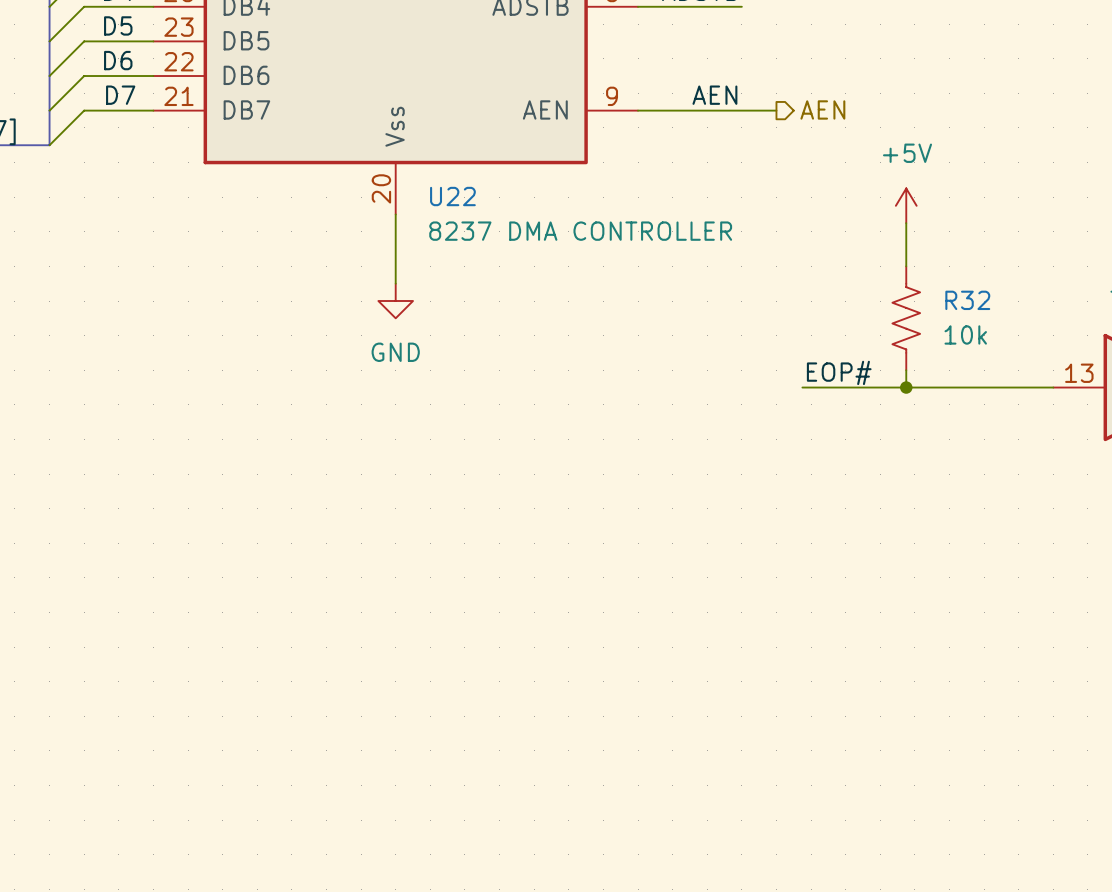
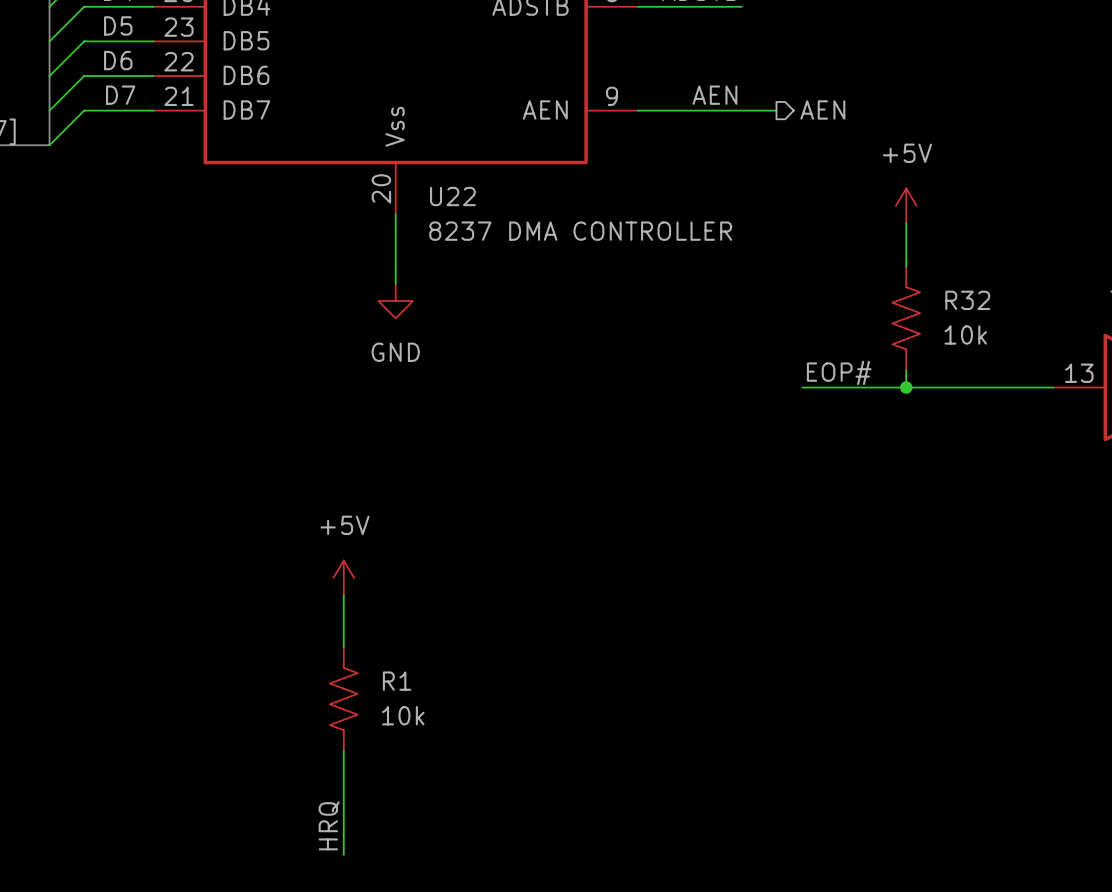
power symbol: none -> +5V (343, 577)
wire: none -> (343, 595) (343, 647)
R1: none -> 10k (343, 699)
wire: none -> (343, 750) (343, 854)
label: none -> HRQ (329, 825)

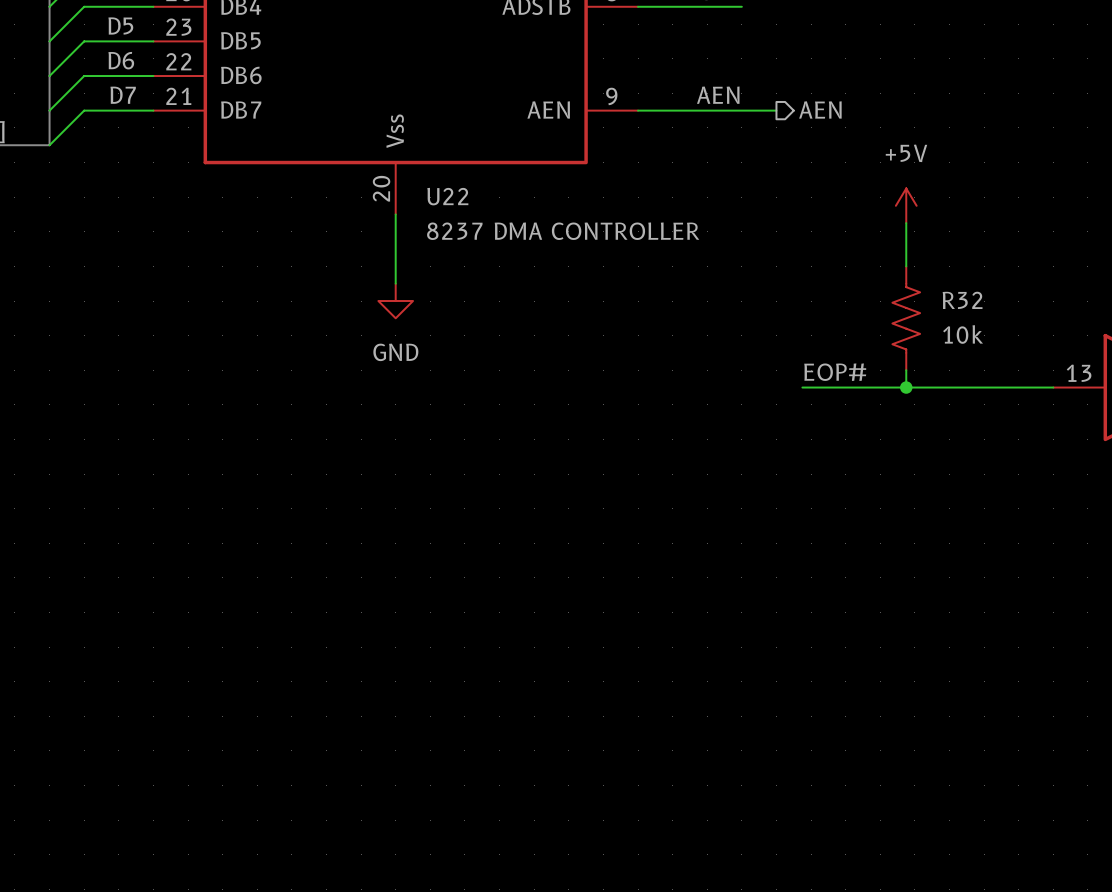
power symbol: +5V (343, 577) -> none
wire: (343, 595) (343, 647) -> none
R1: 10k (343, 699) -> none
wire: (343, 750) (343, 854) -> none
label: HRQ (329, 825) -> none

